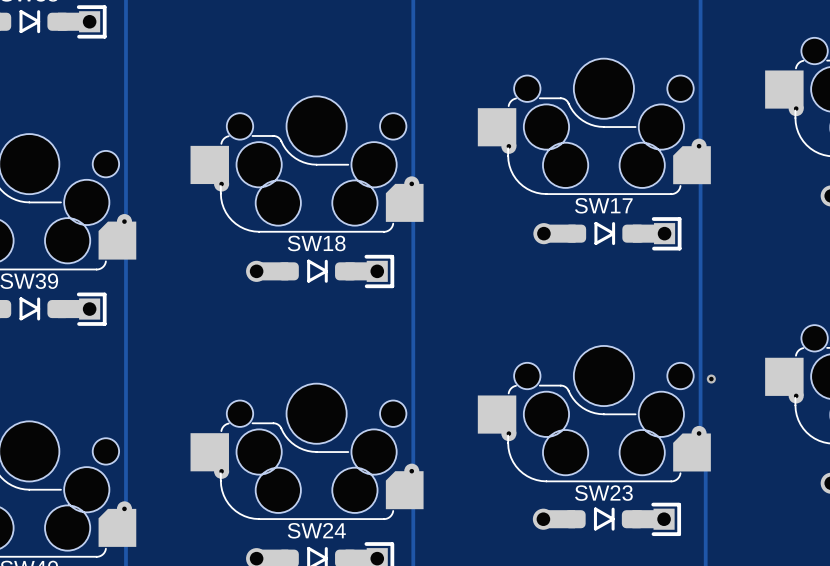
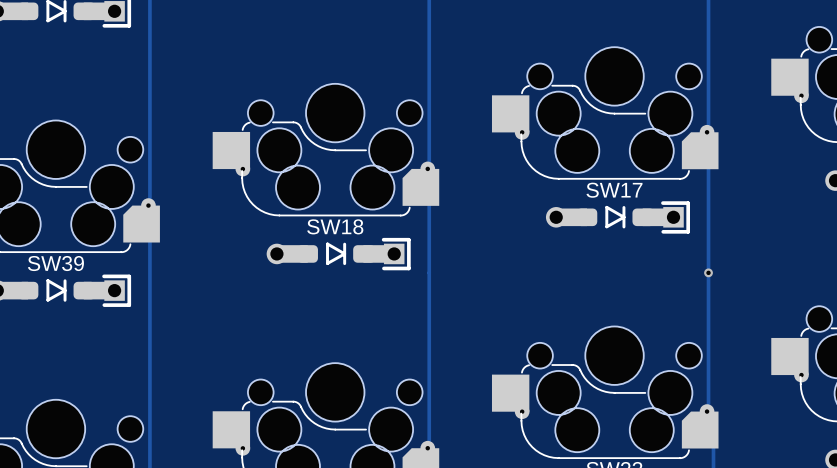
via: none -> (708, 272)
via: (711, 379) -> none

